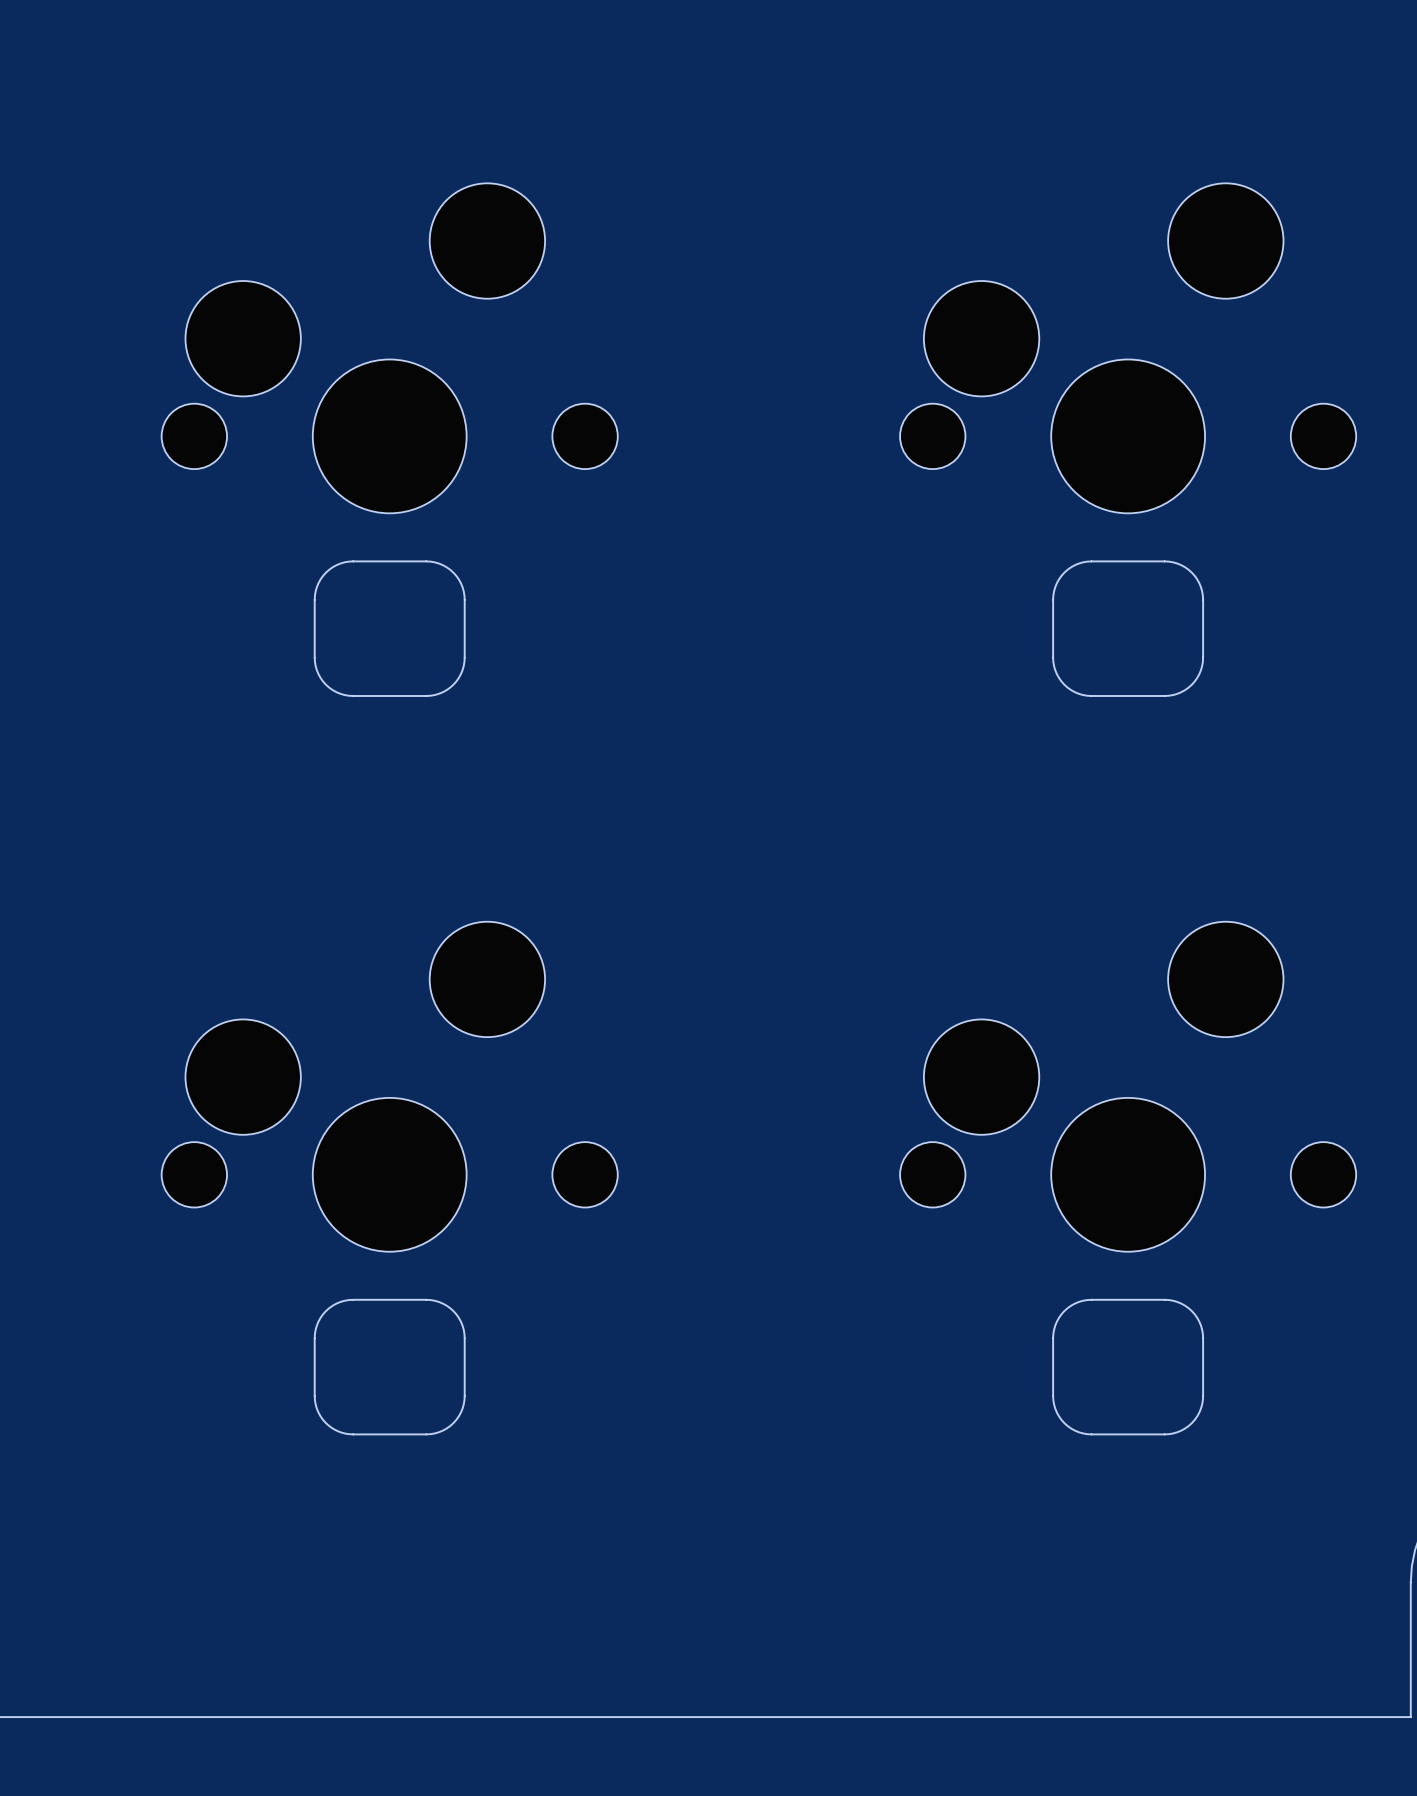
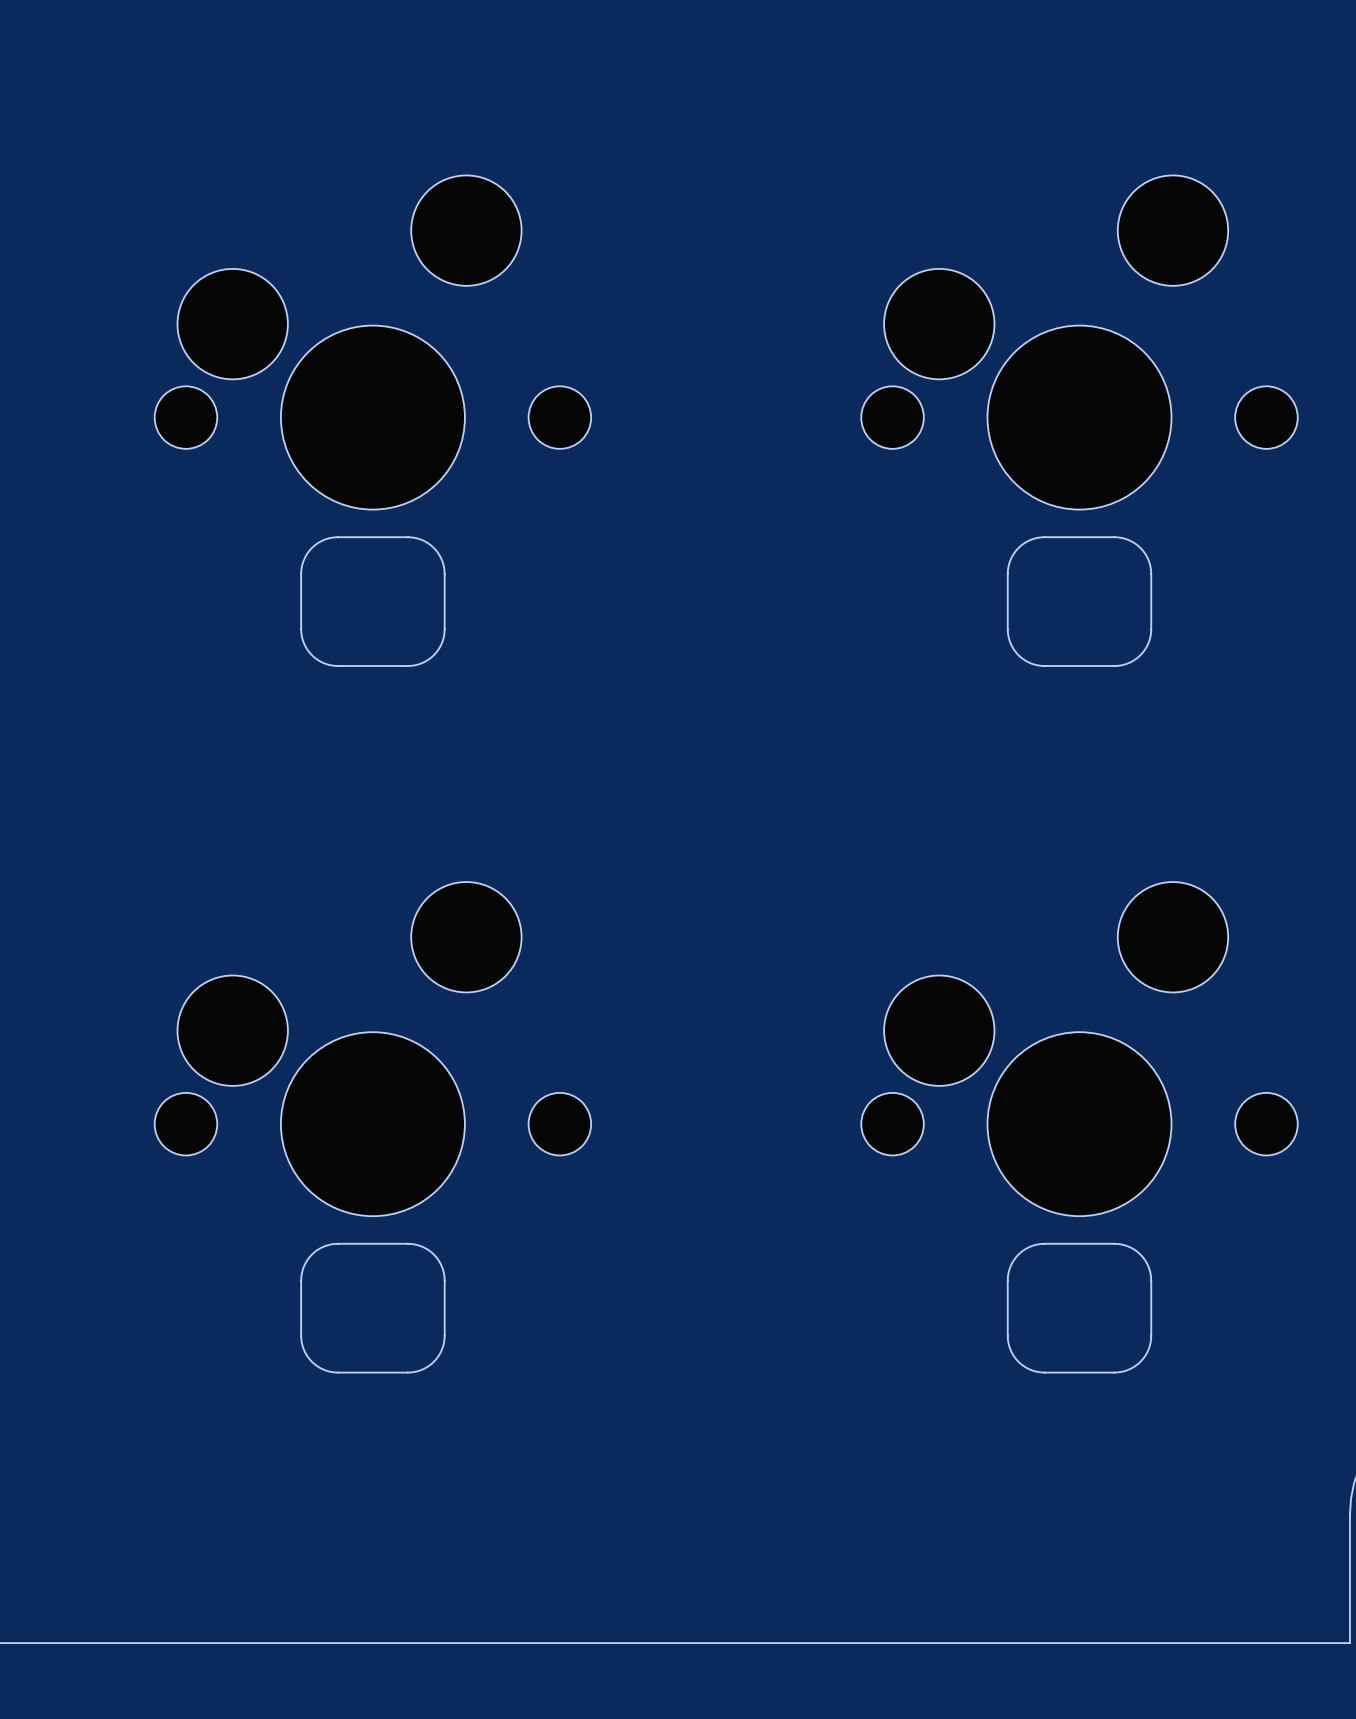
part footprint: [161, 183, 618, 514] -> [154, 175, 592, 510]
part footprint: [900, 183, 1357, 514] -> [861, 175, 1298, 510]
part footprint: [161, 921, 618, 1252] -> [154, 882, 592, 1217]
part footprint: [900, 921, 1357, 1252] -> [861, 882, 1298, 1217]

